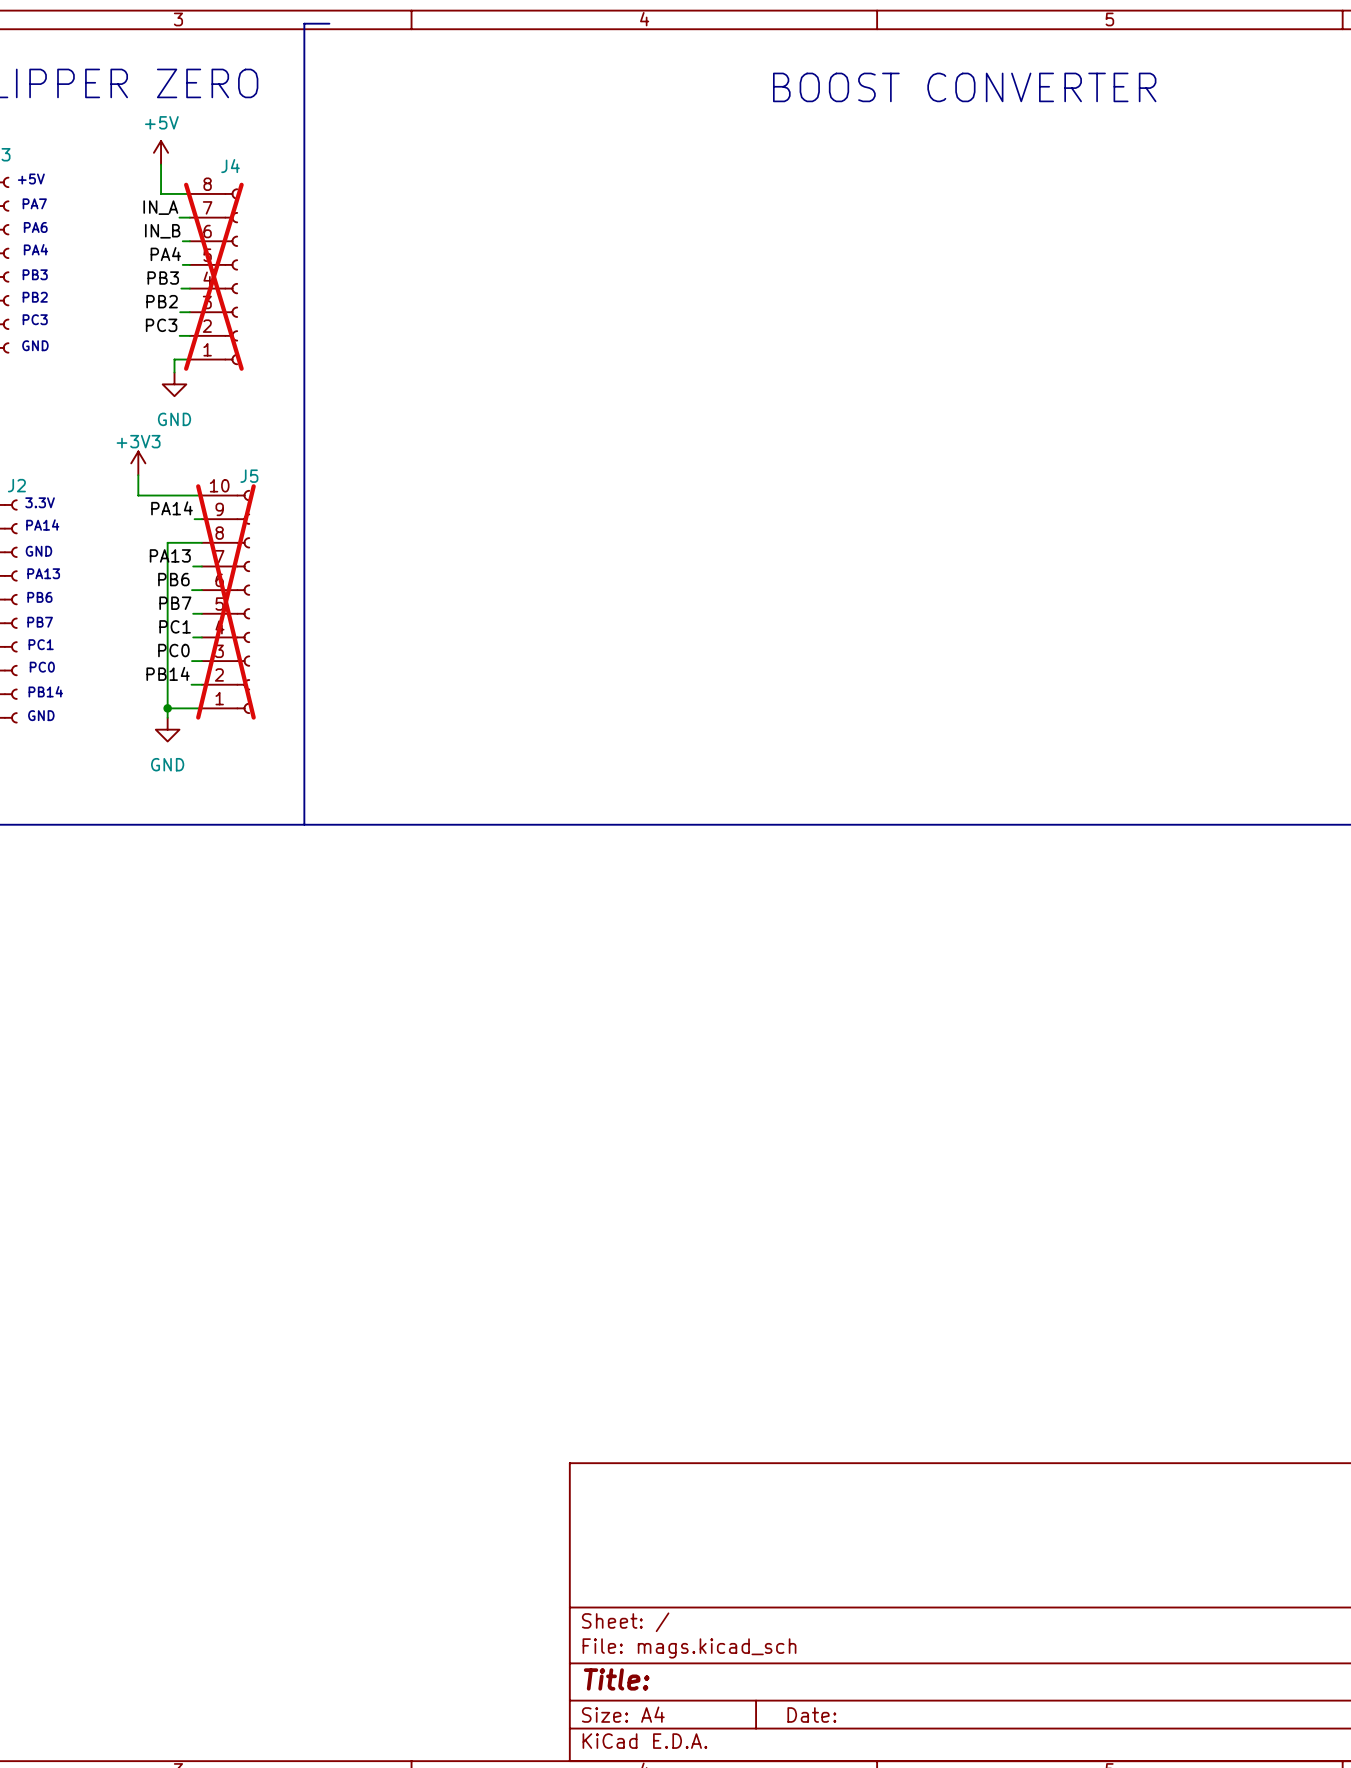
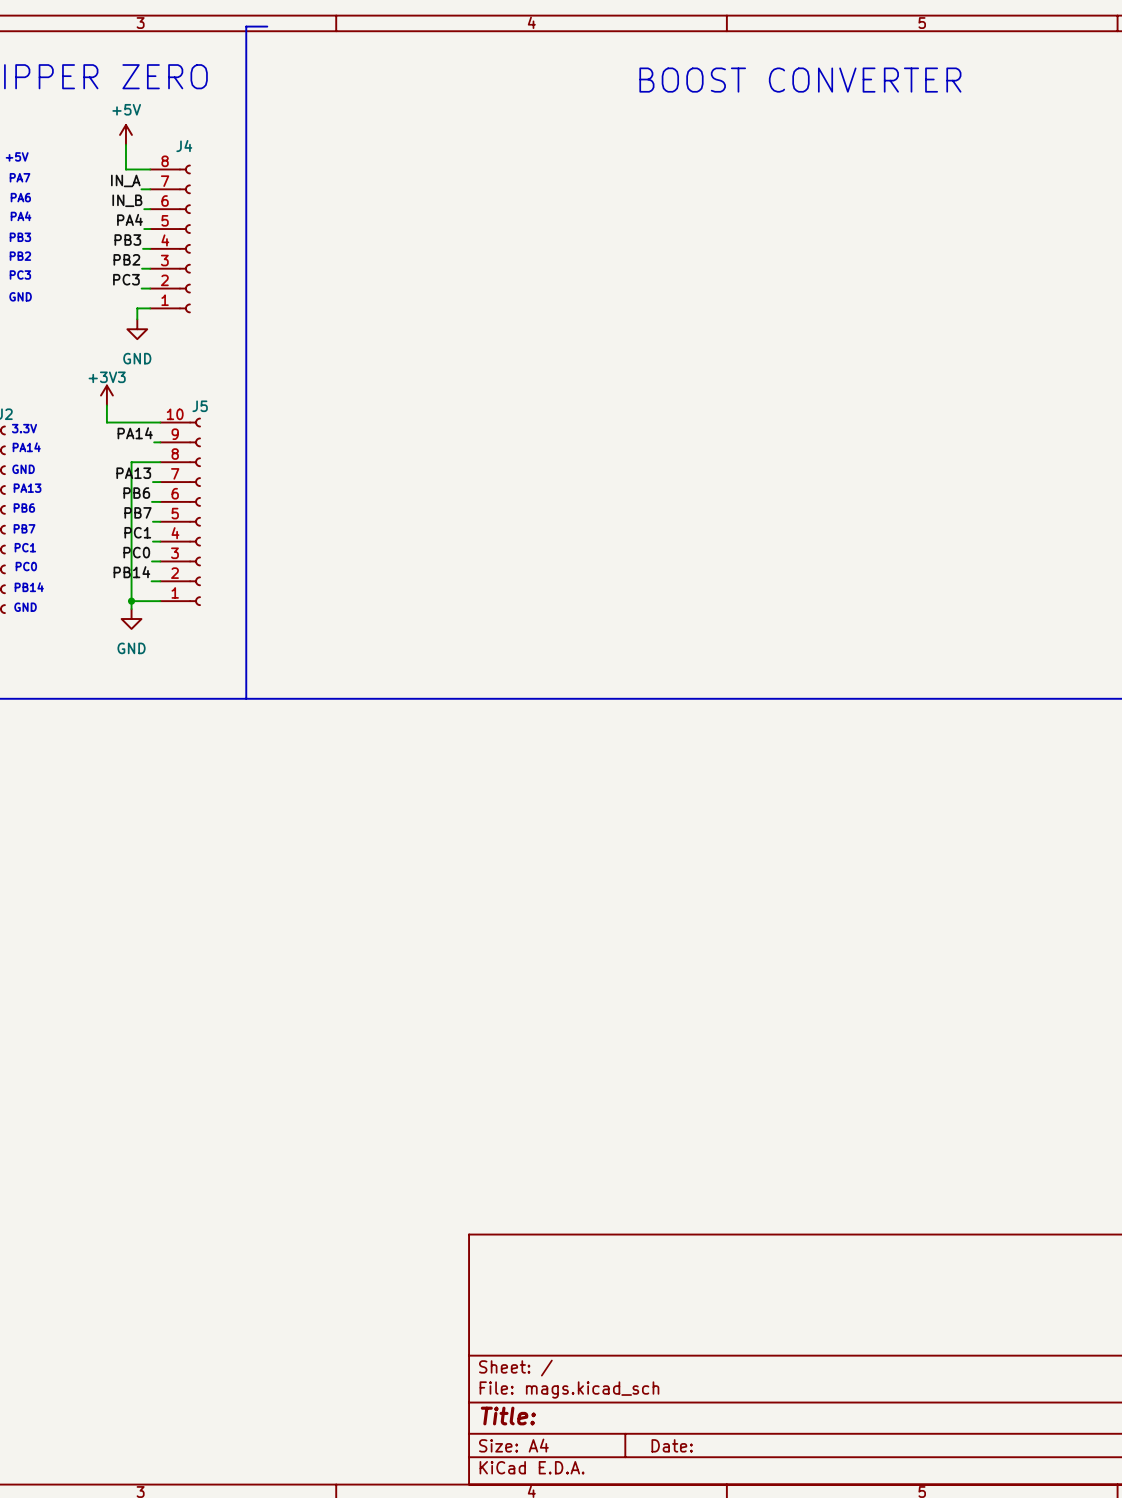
J4 do-not-place cross: (213, 276) -> none
J5 do-not-place cross: (225, 601) -> none

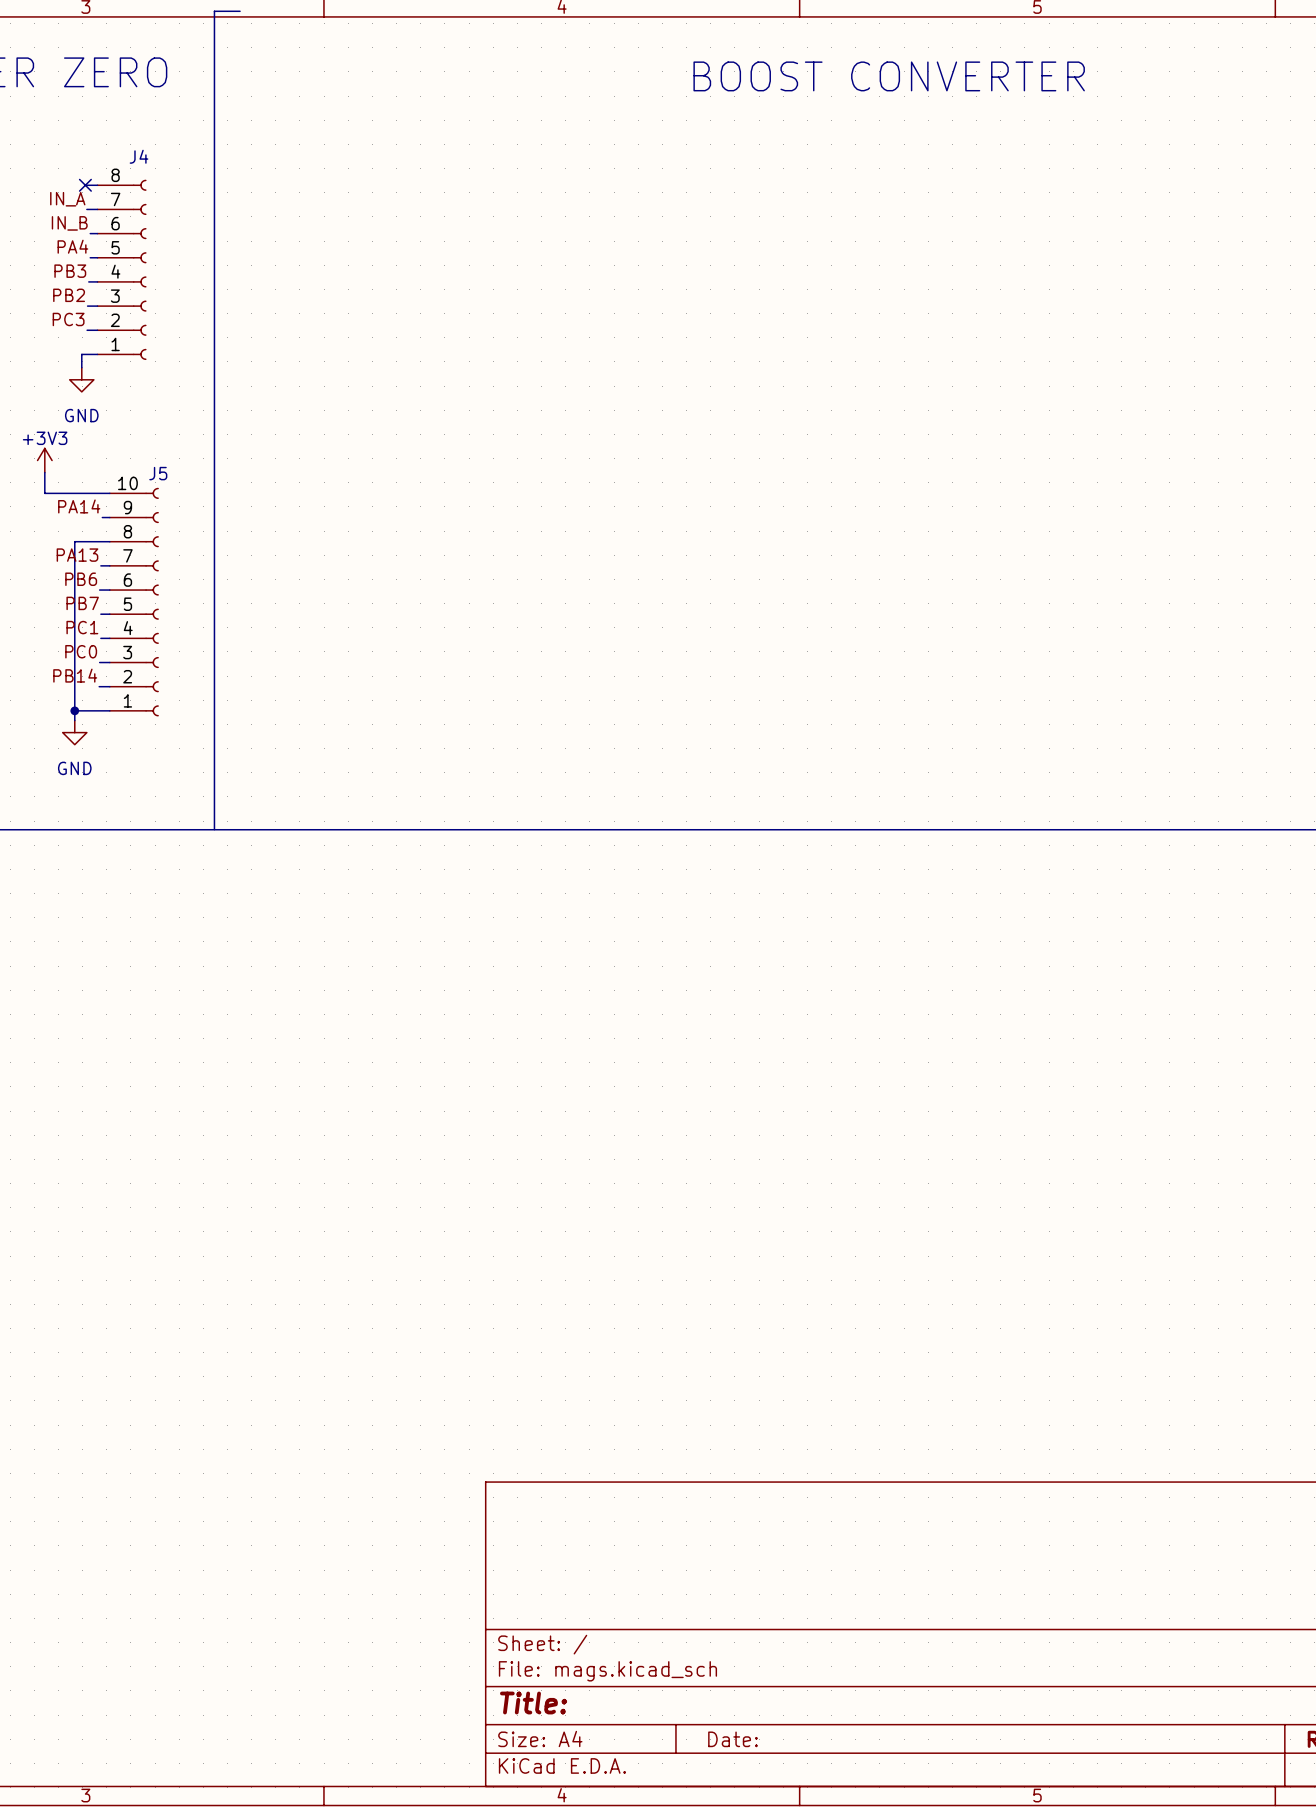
power symbol: +5V (125, 134) -> none
wire: (125, 144) (125, 169) (140, 169) -> none
no-connect mark: none -> (85, 185)

